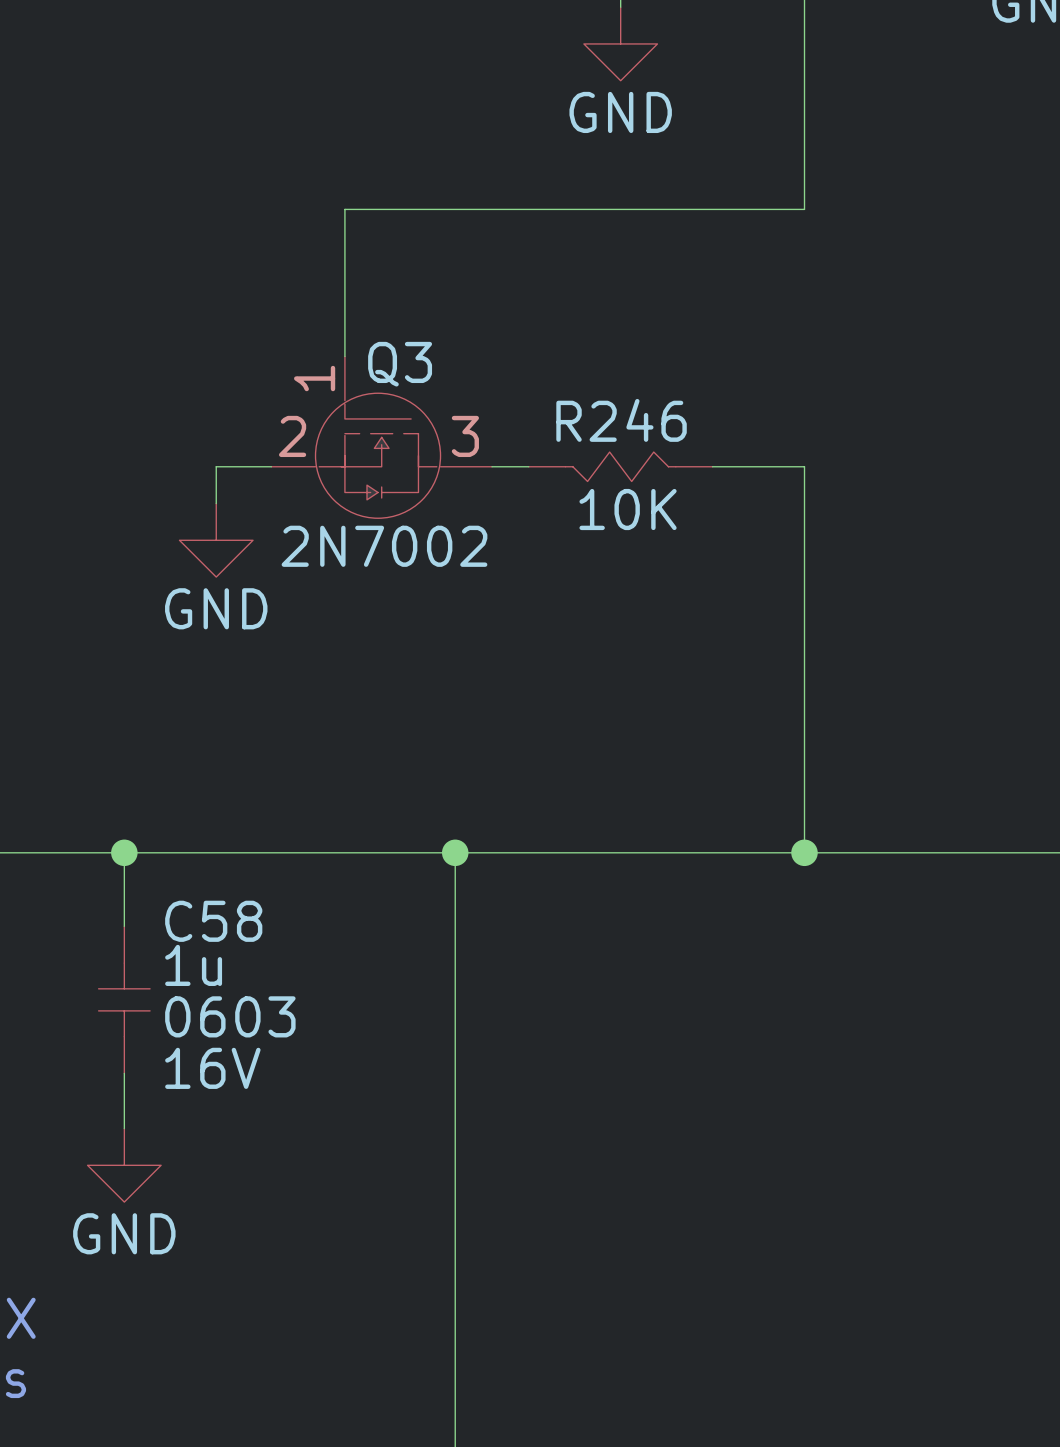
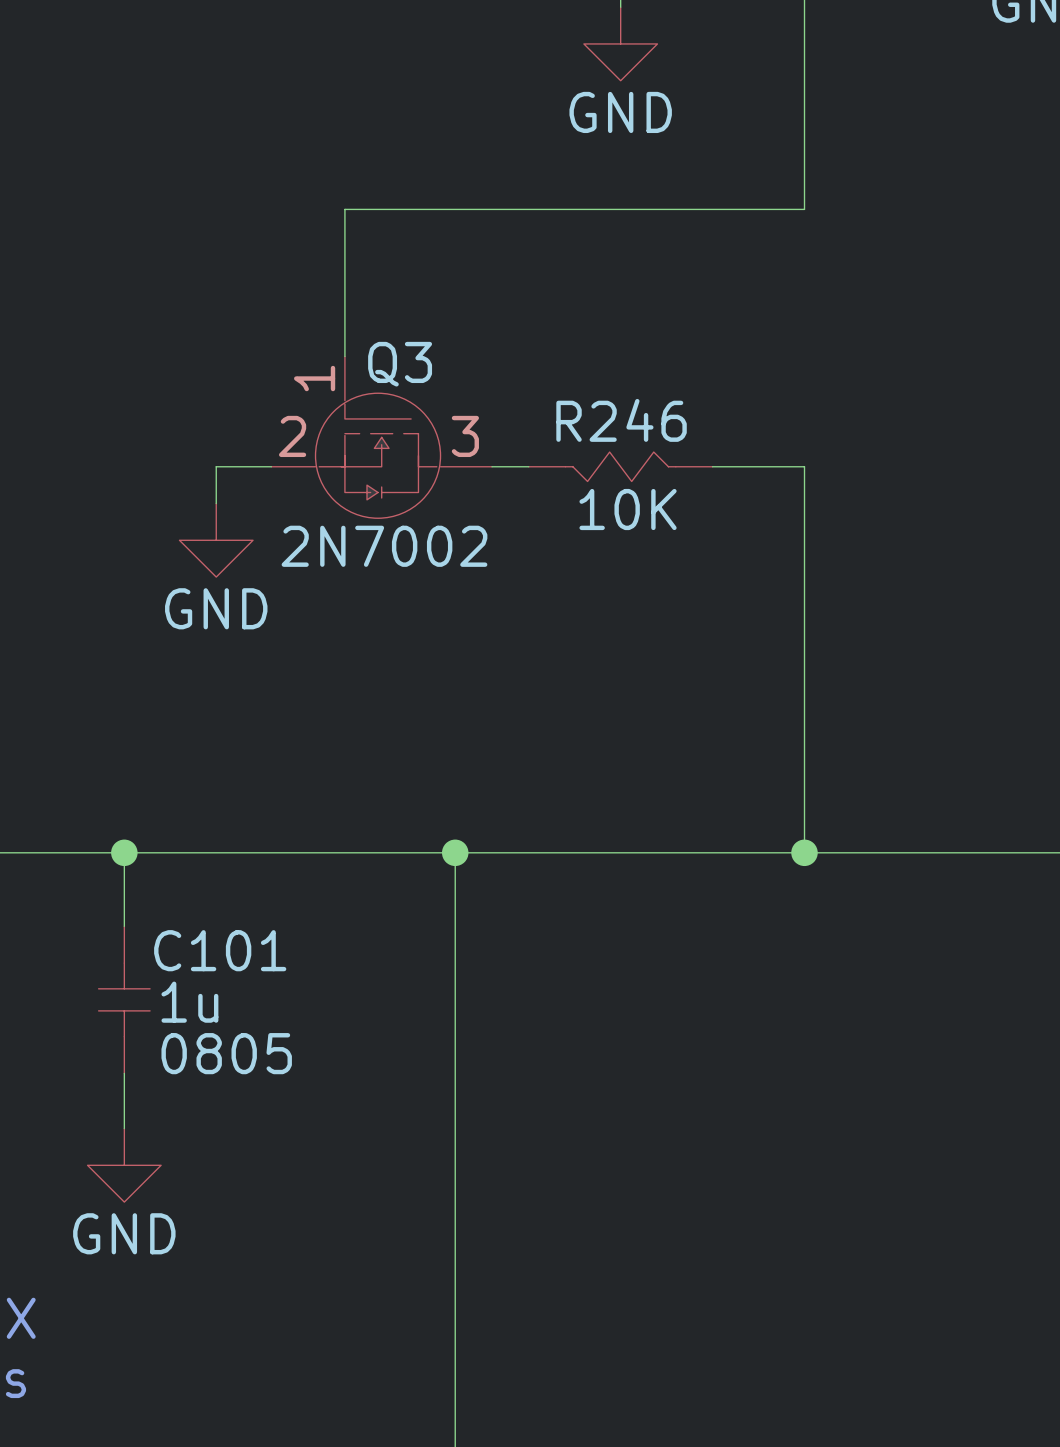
C58 name: C58 (213, 921) -> C101 (220, 950)
C58 value position: 1u (193, 965) -> 1u (189, 1002)
C58 text: 0603 (230, 1016) -> 0805 (226, 1053)
C58 text: 16V (212, 1068) -> none

